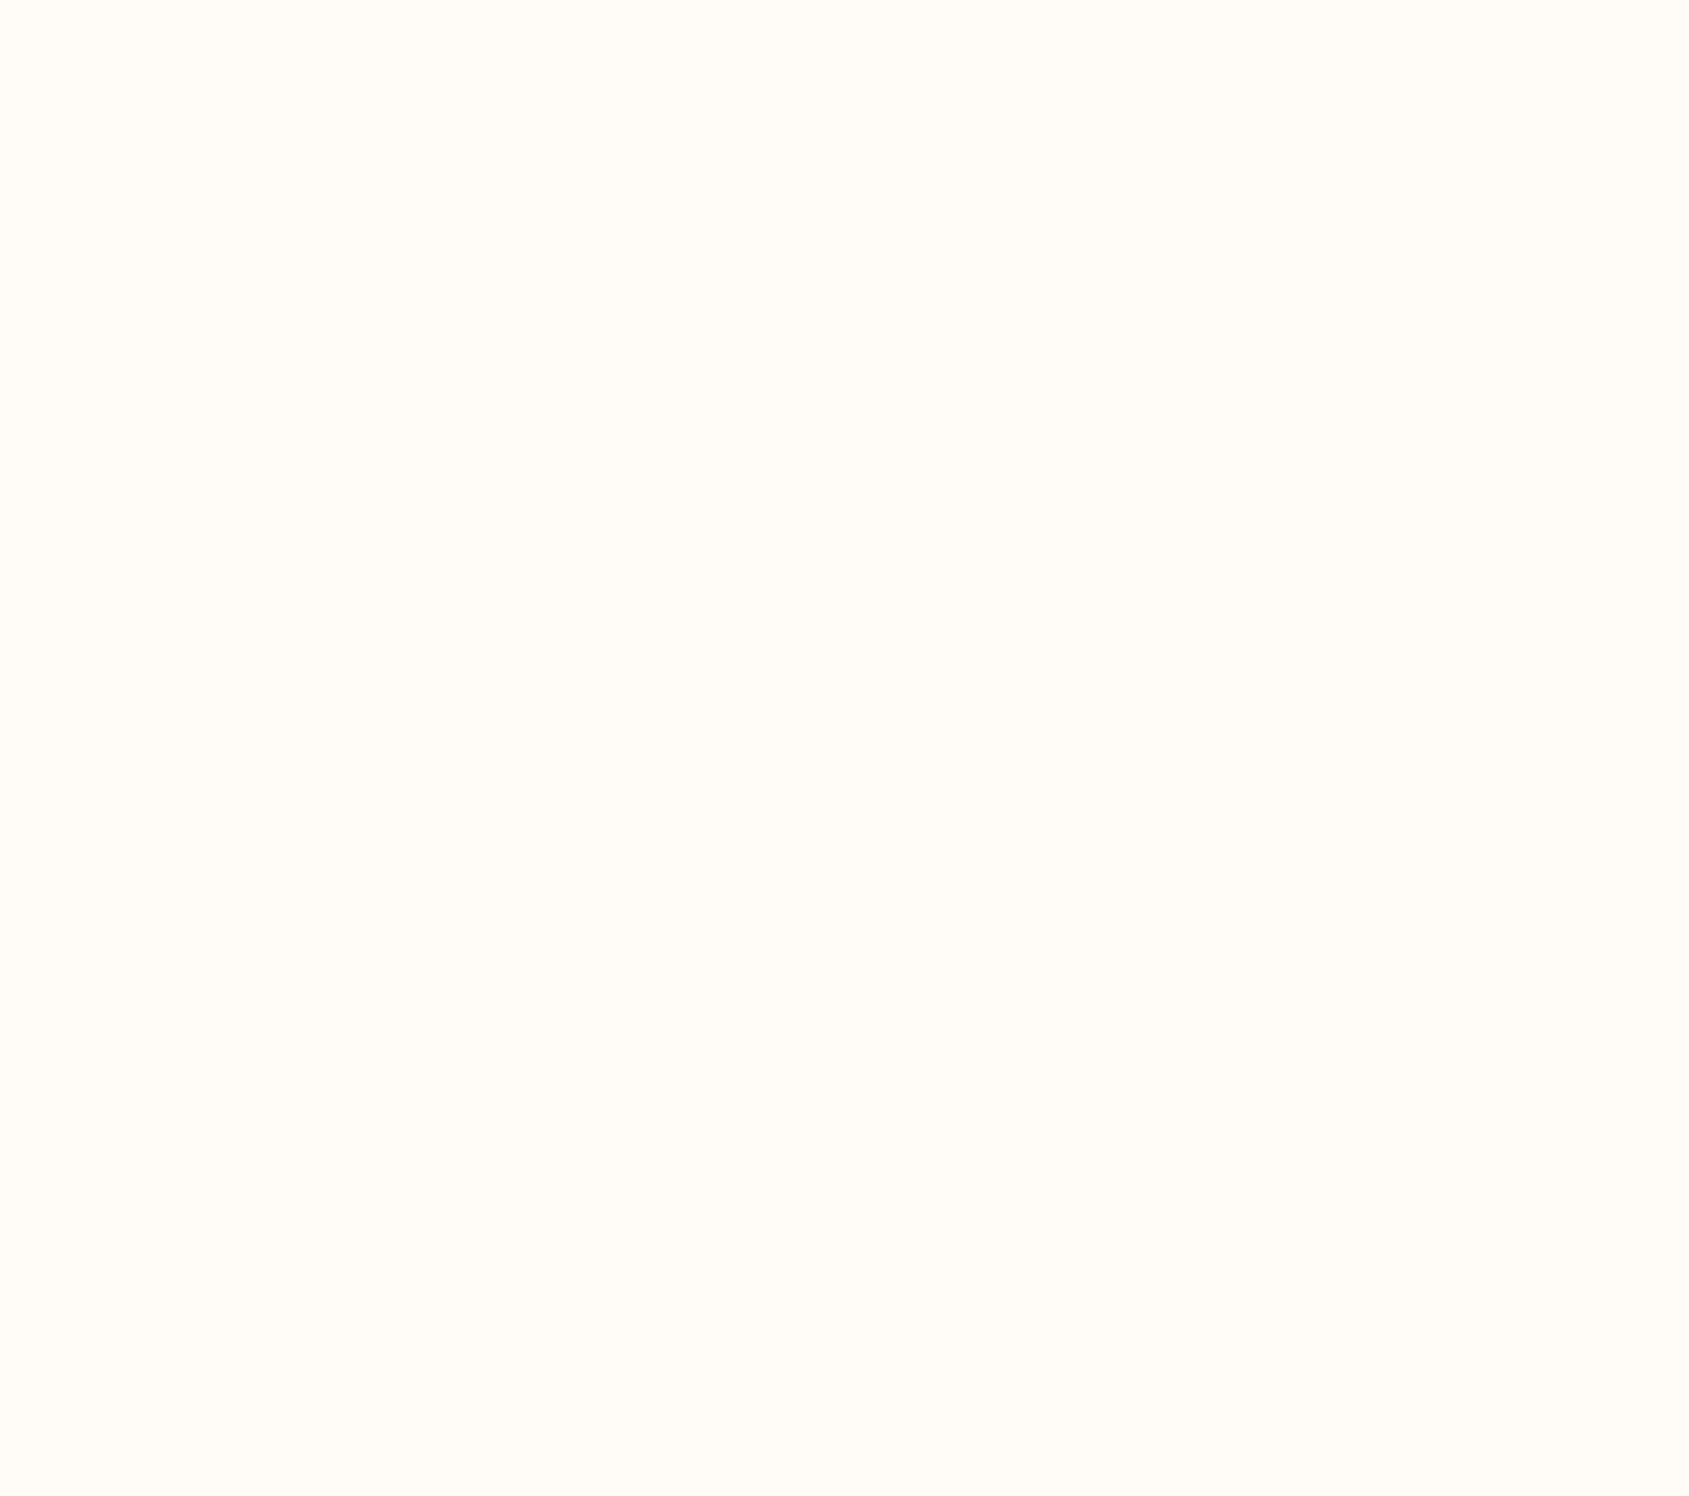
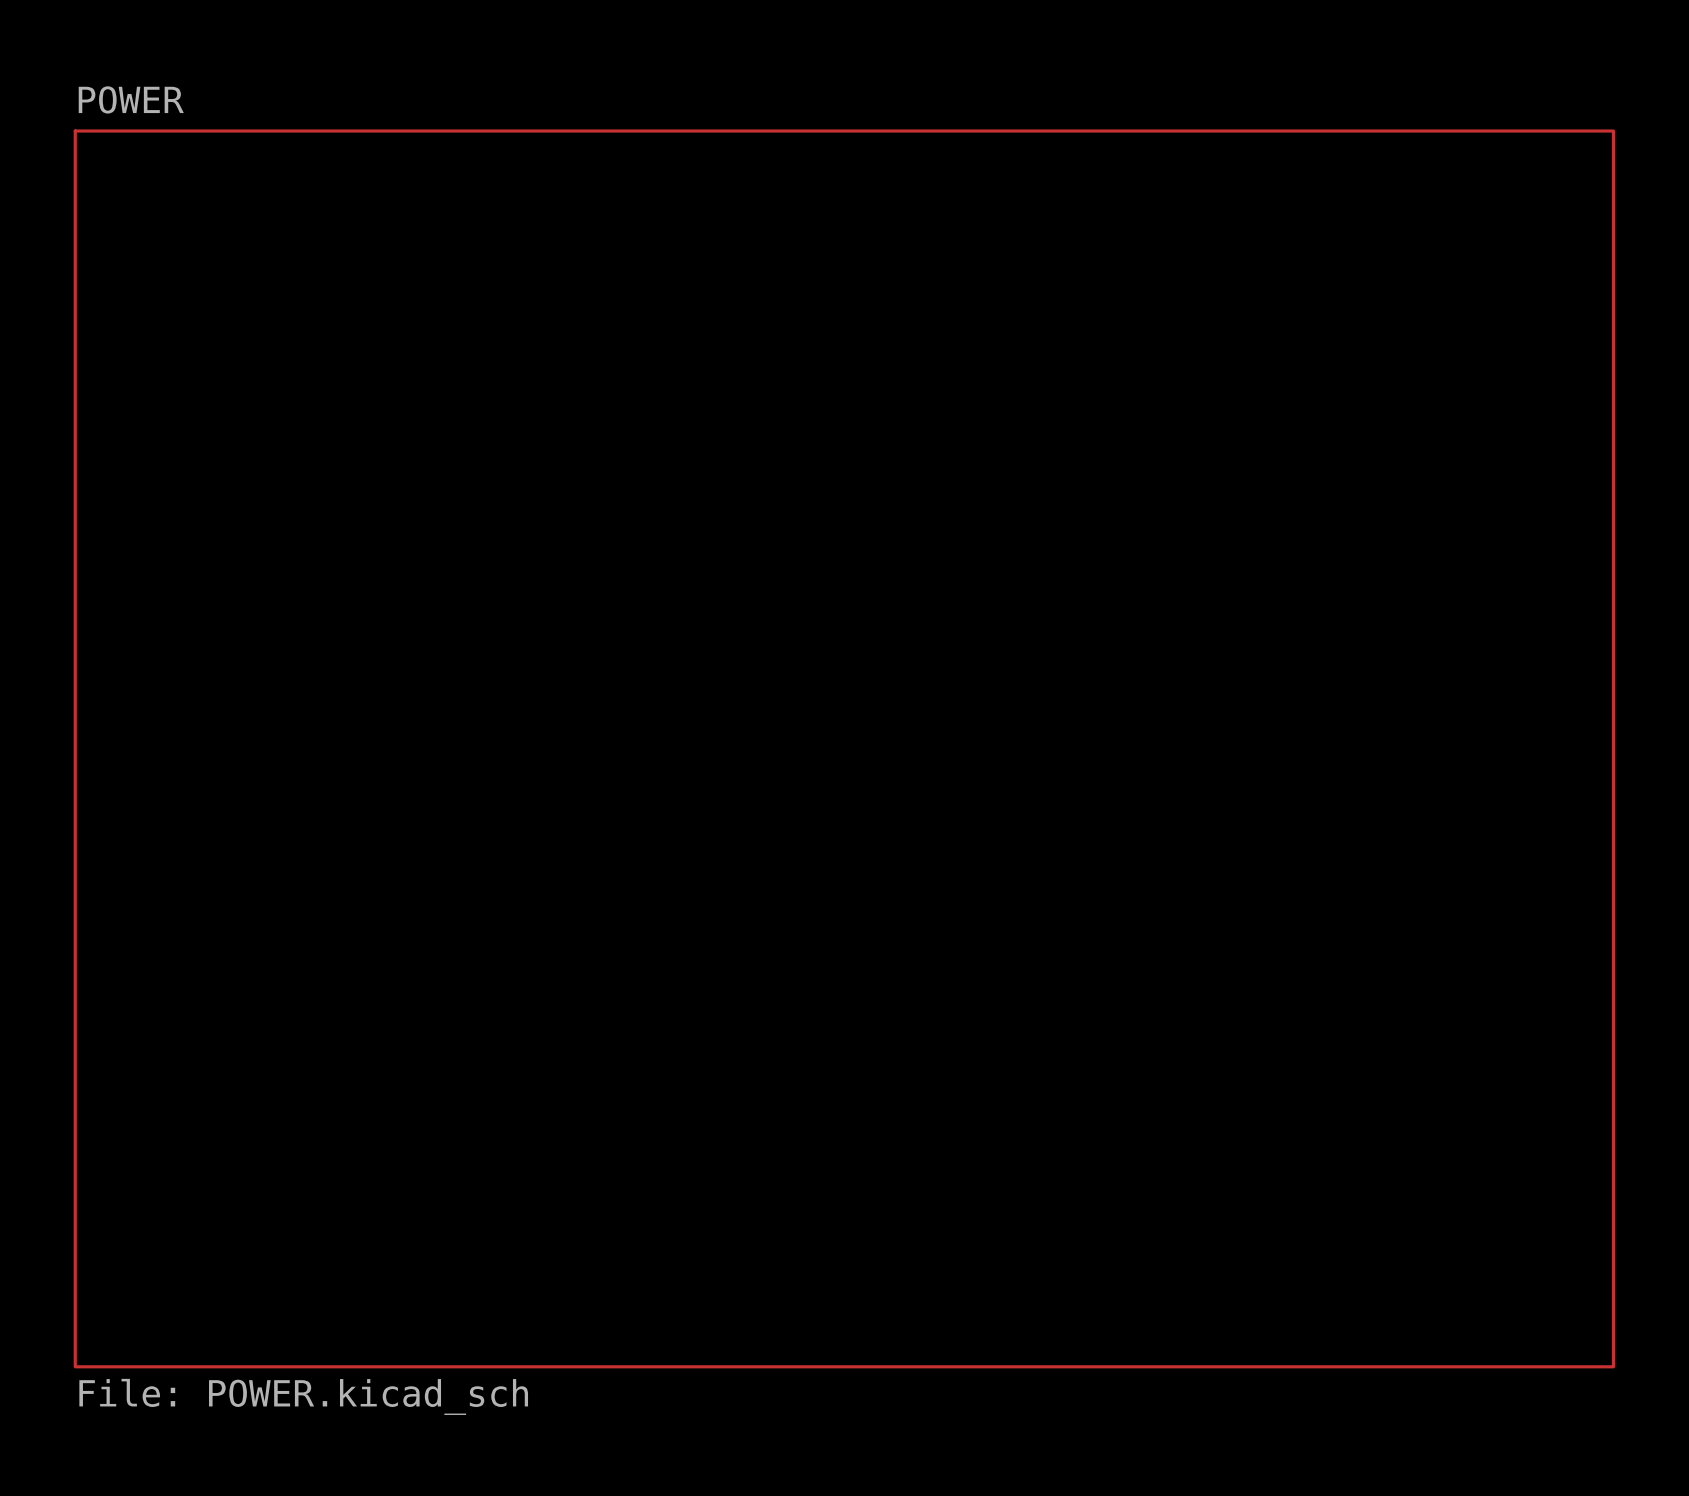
sheet POWER: none -> File: POWER.kicad_sch (844, 748)

